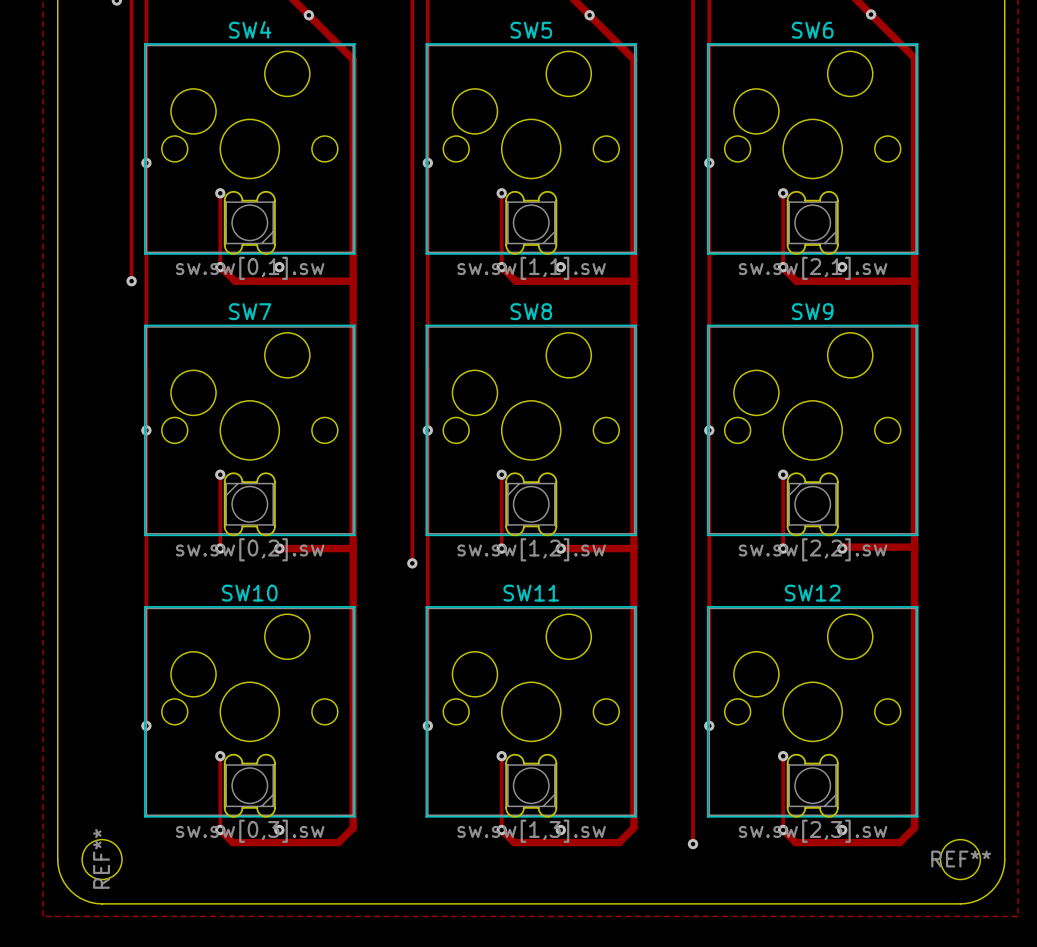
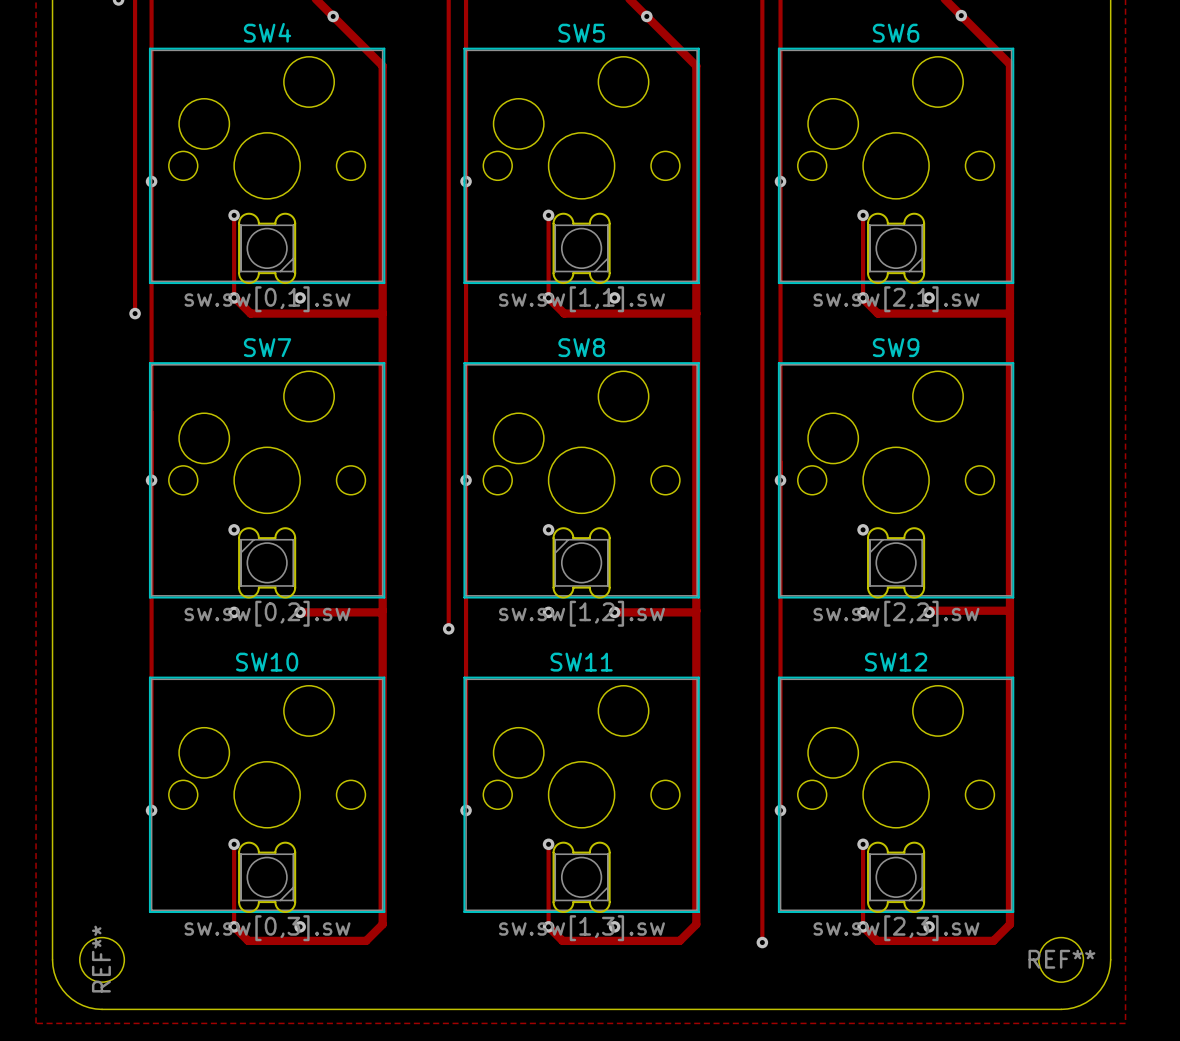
track: (220, 474) (220, 548) -> none
track: (501, 474) (501, 548) -> none
track: (783, 474) (783, 548) -> none

